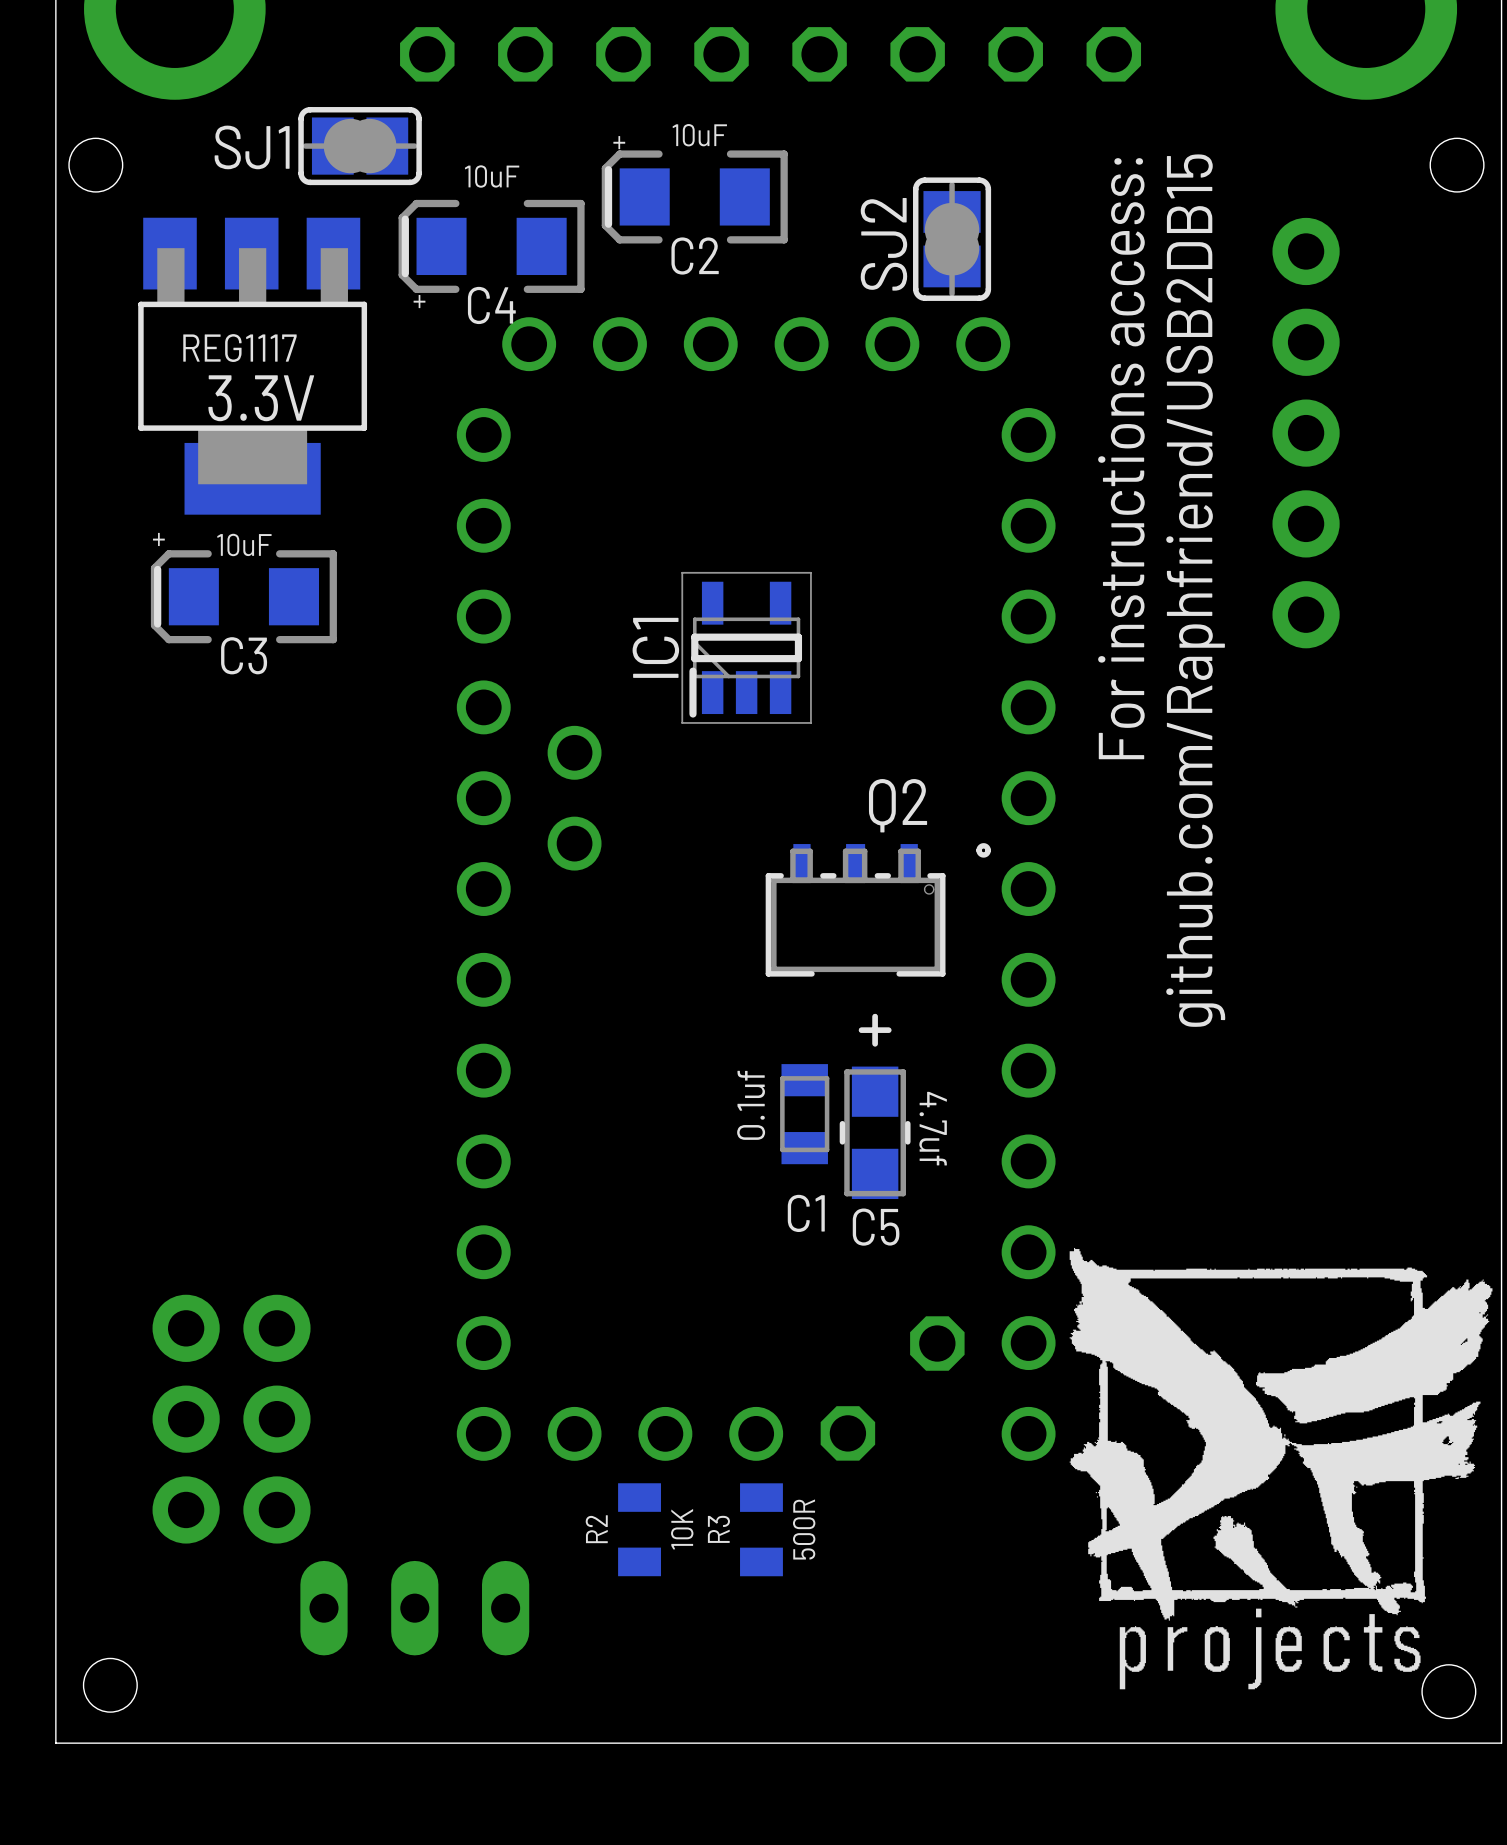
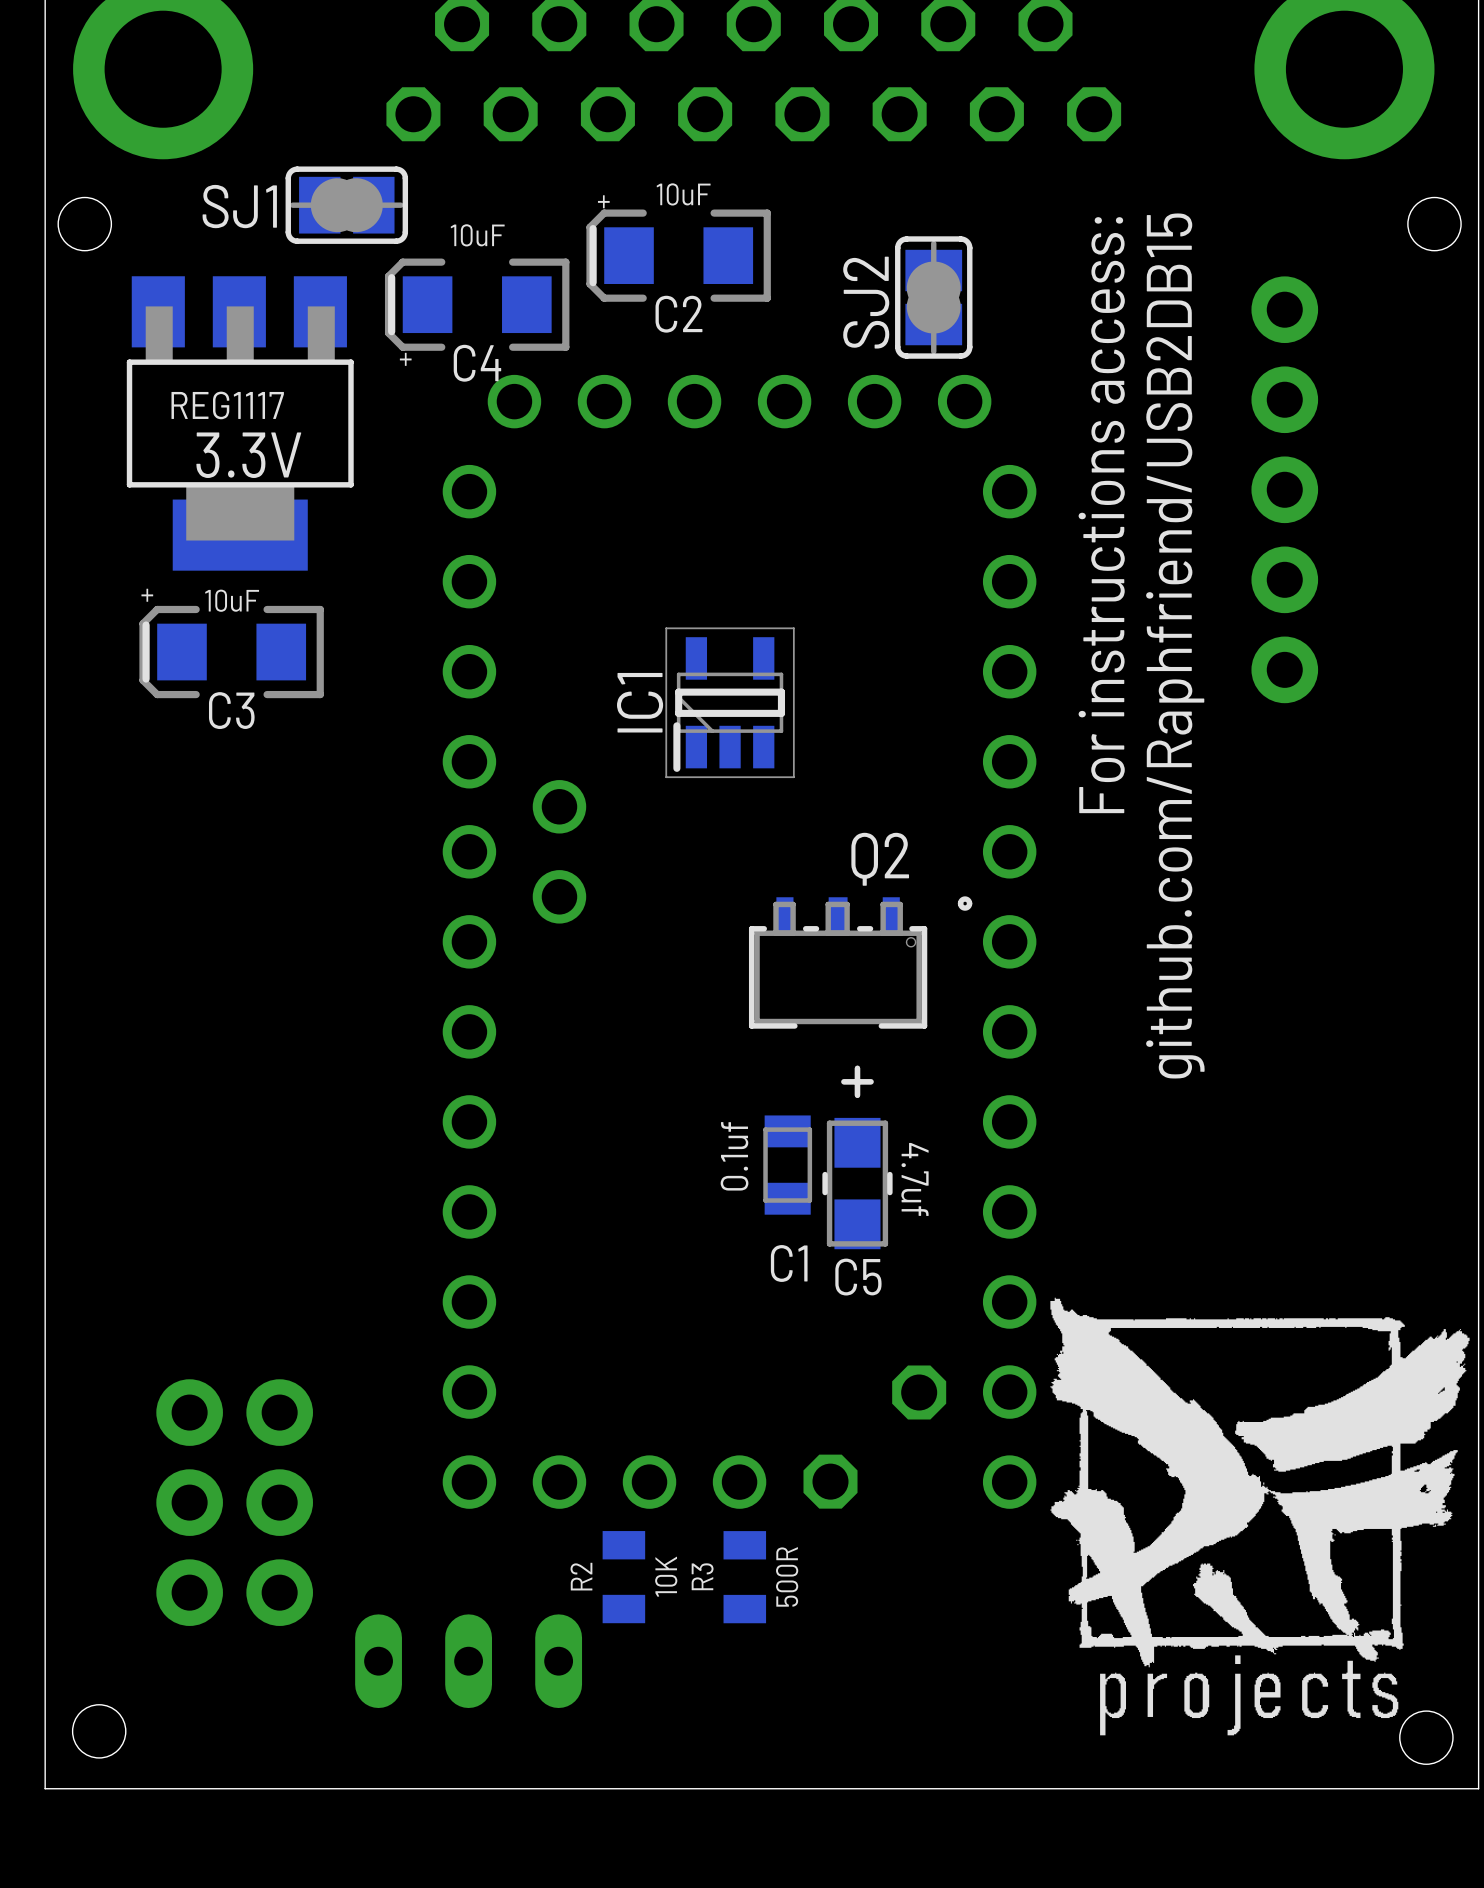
part position: (231, 1419) -> (234, 1502)
part position: (414, 1608) -> (468, 1661)

